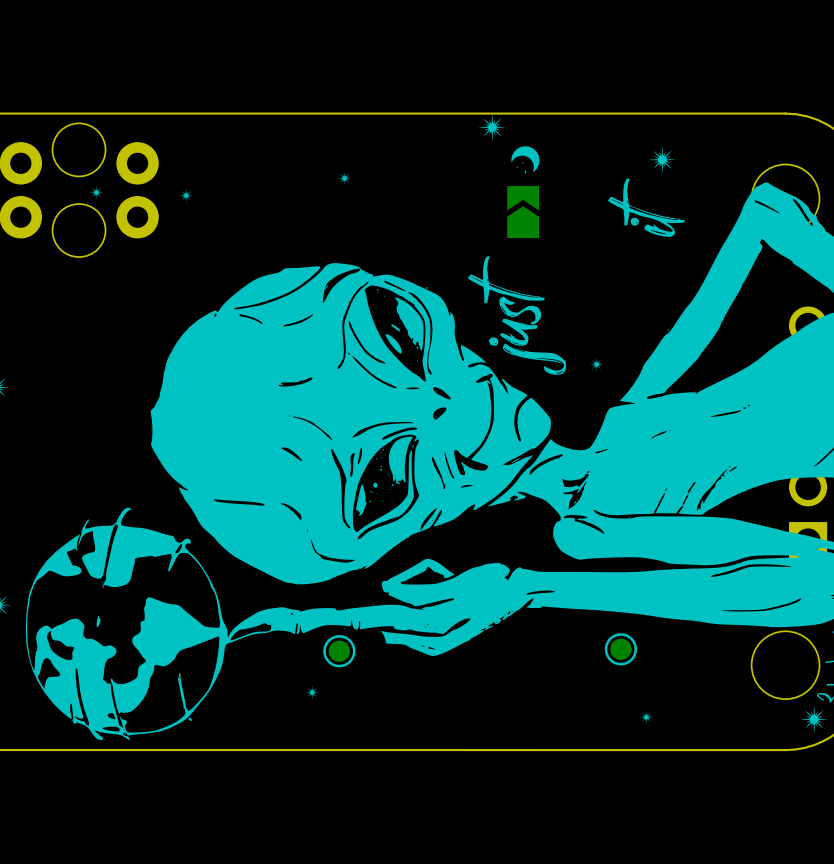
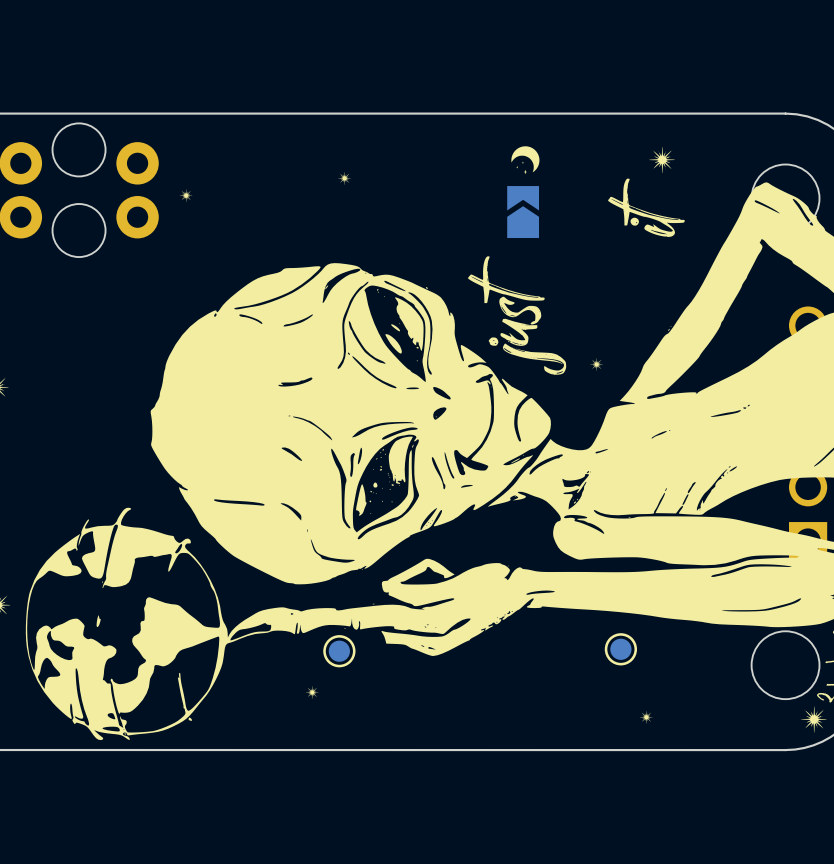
drawing: [478, 114, 505, 141] -> none
drawing: [89, 186, 103, 200] -> none

